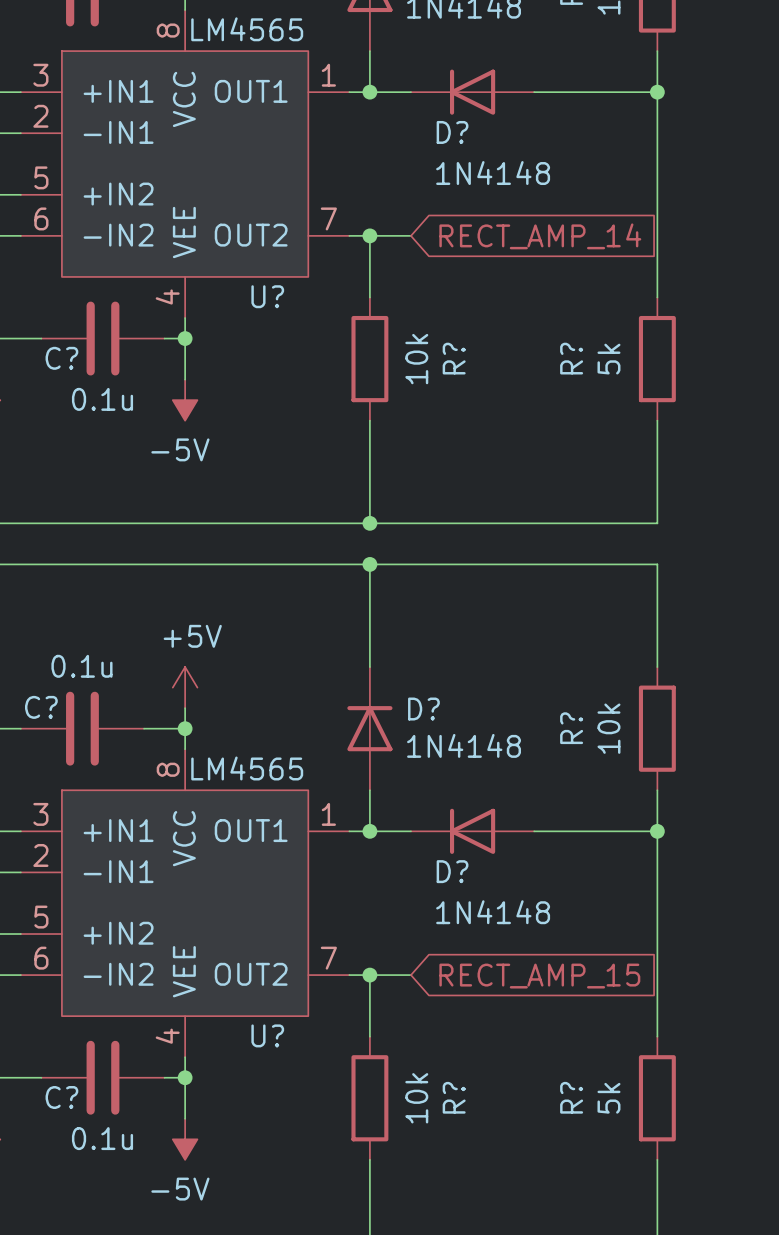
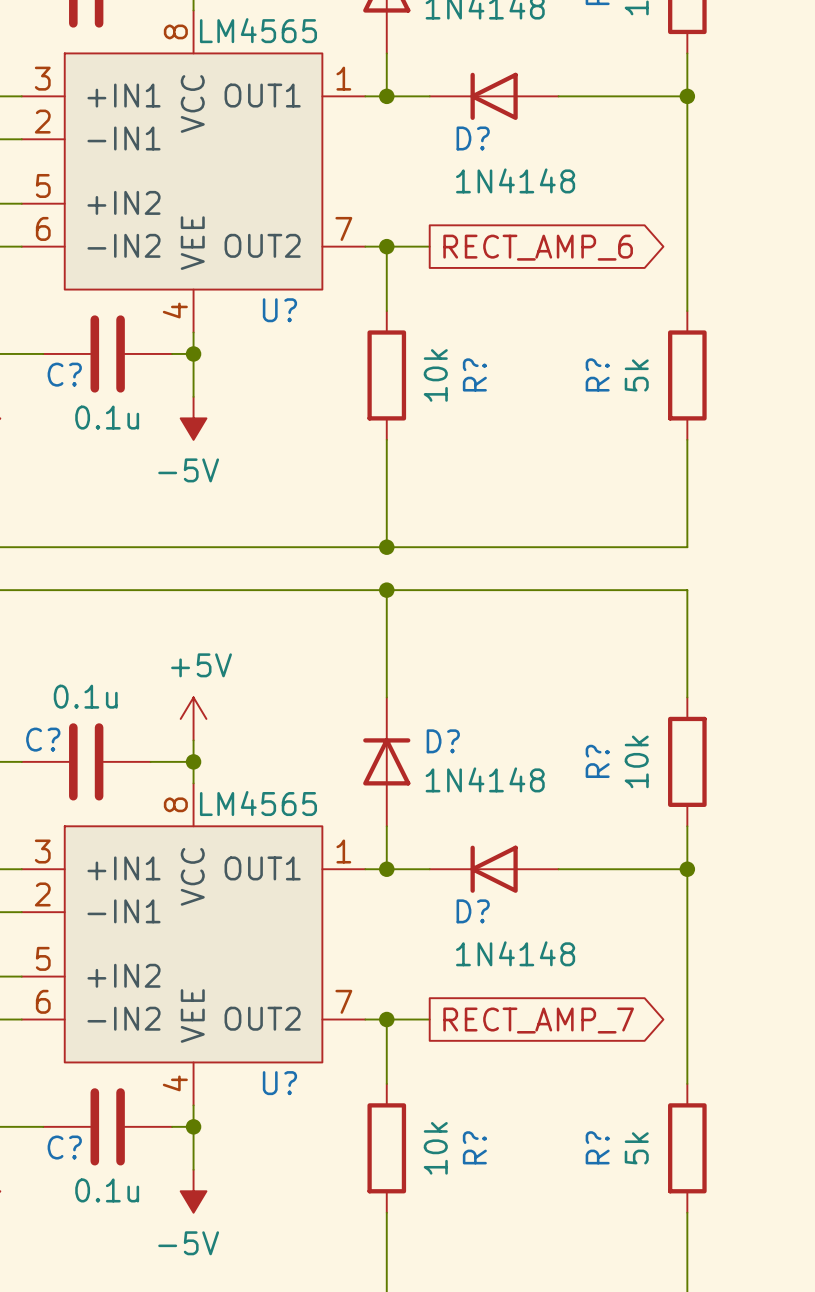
global label shape: input (540, 236) -> output (538, 247)
global label: RECT_AMP_14 (540, 236) -> RECT_AMP_6 (538, 247)
global label shape: input (539, 976) -> output (538, 1020)
global label: RECT_AMP_15 (539, 976) -> RECT_AMP_7 (538, 1020)

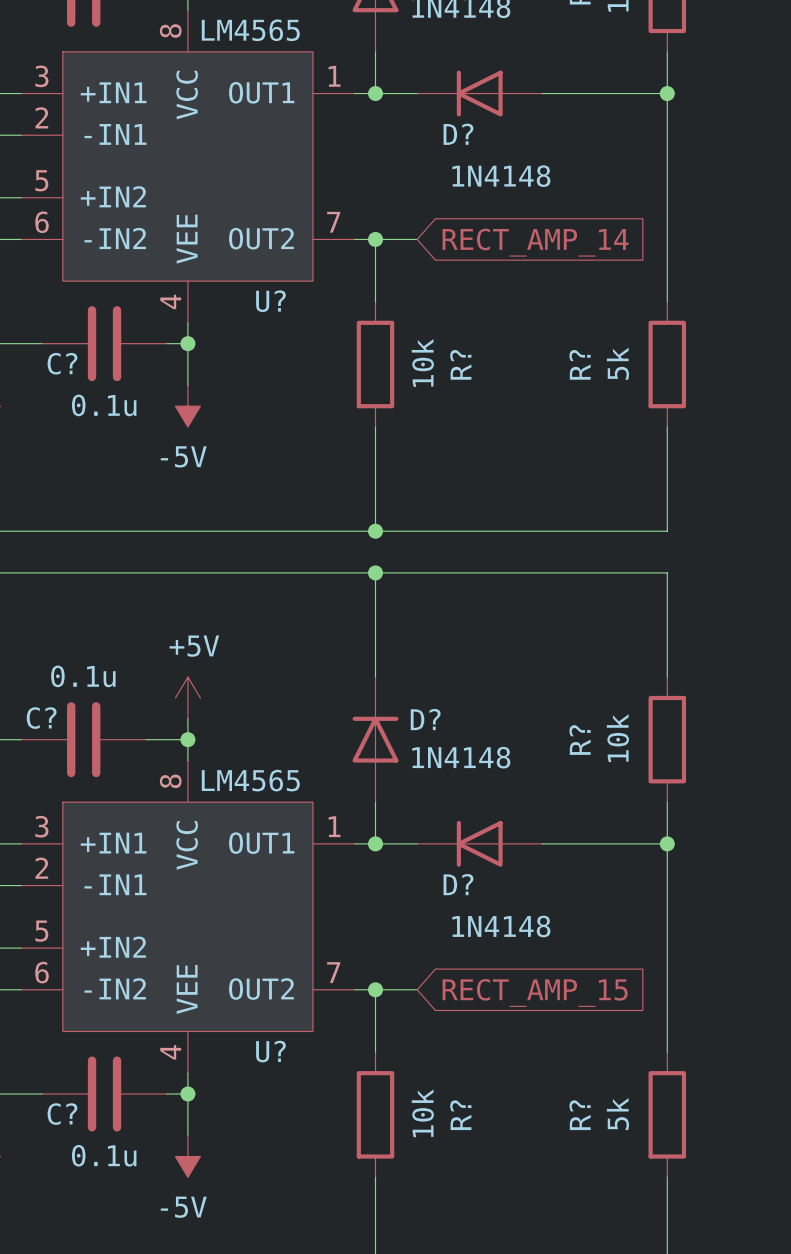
global label shape: output (538, 247) -> input (535, 242)
global label: RECT_AMP_6 (538, 247) -> RECT_AMP_14 (535, 242)
global label shape: output (538, 1020) -> input (535, 992)
global label: RECT_AMP_7 (538, 1020) -> RECT_AMP_15 (535, 992)

